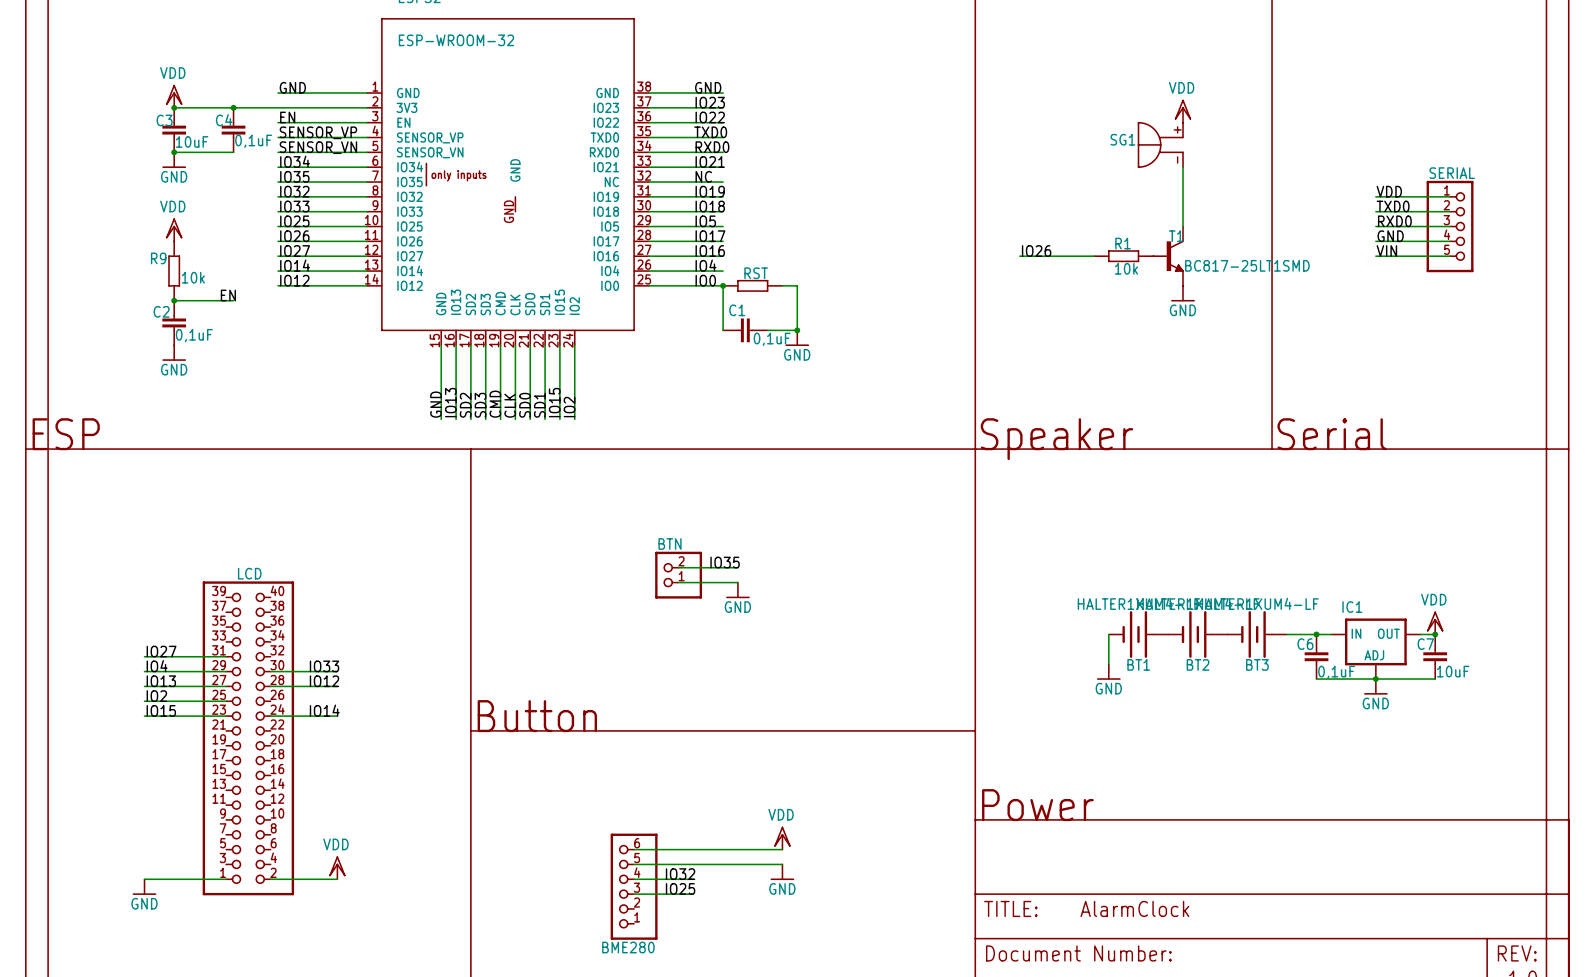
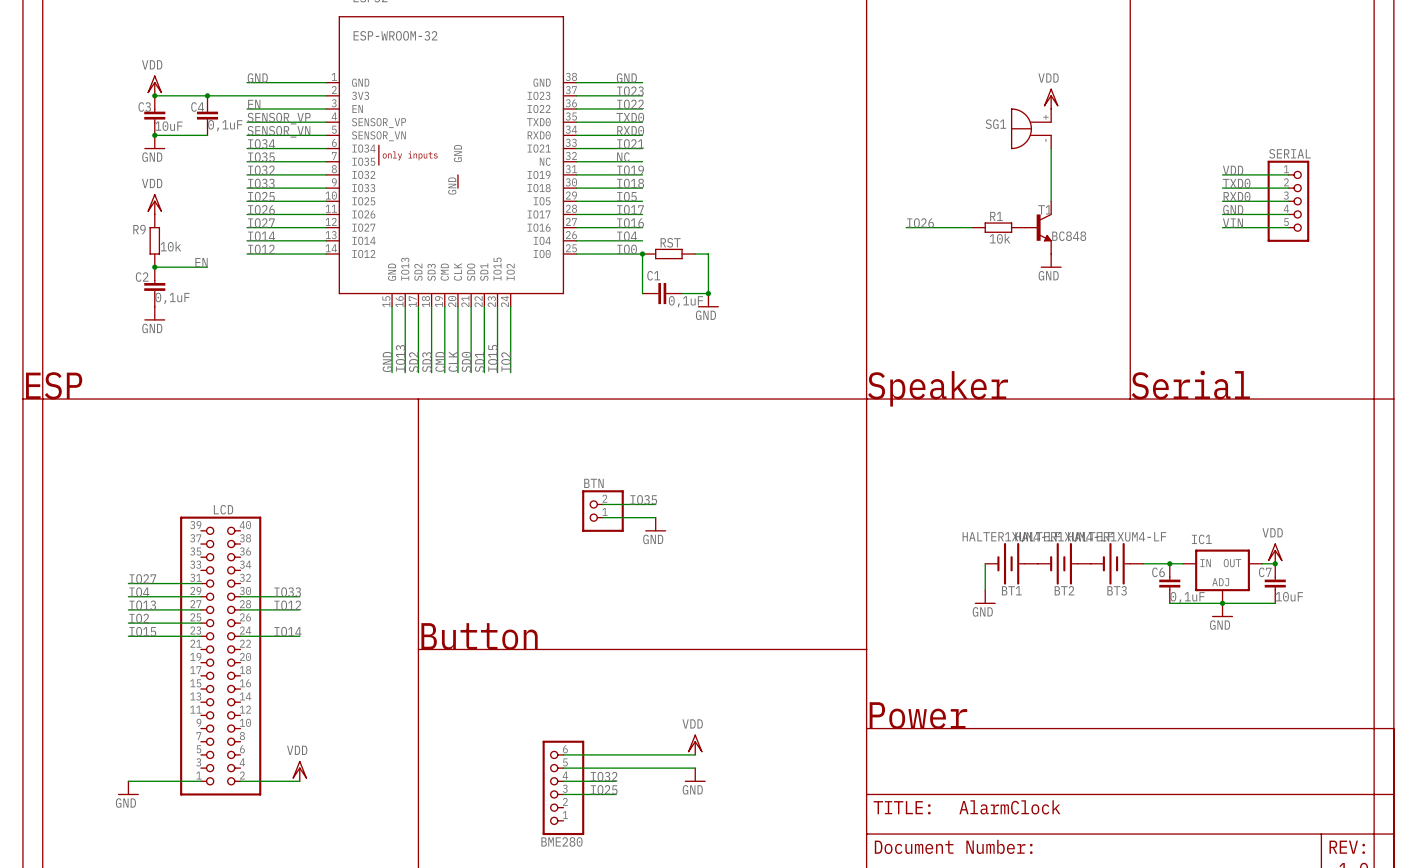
T1 value: BC817-25LT1SMD (1247, 265) -> BC848 (1069, 236)

